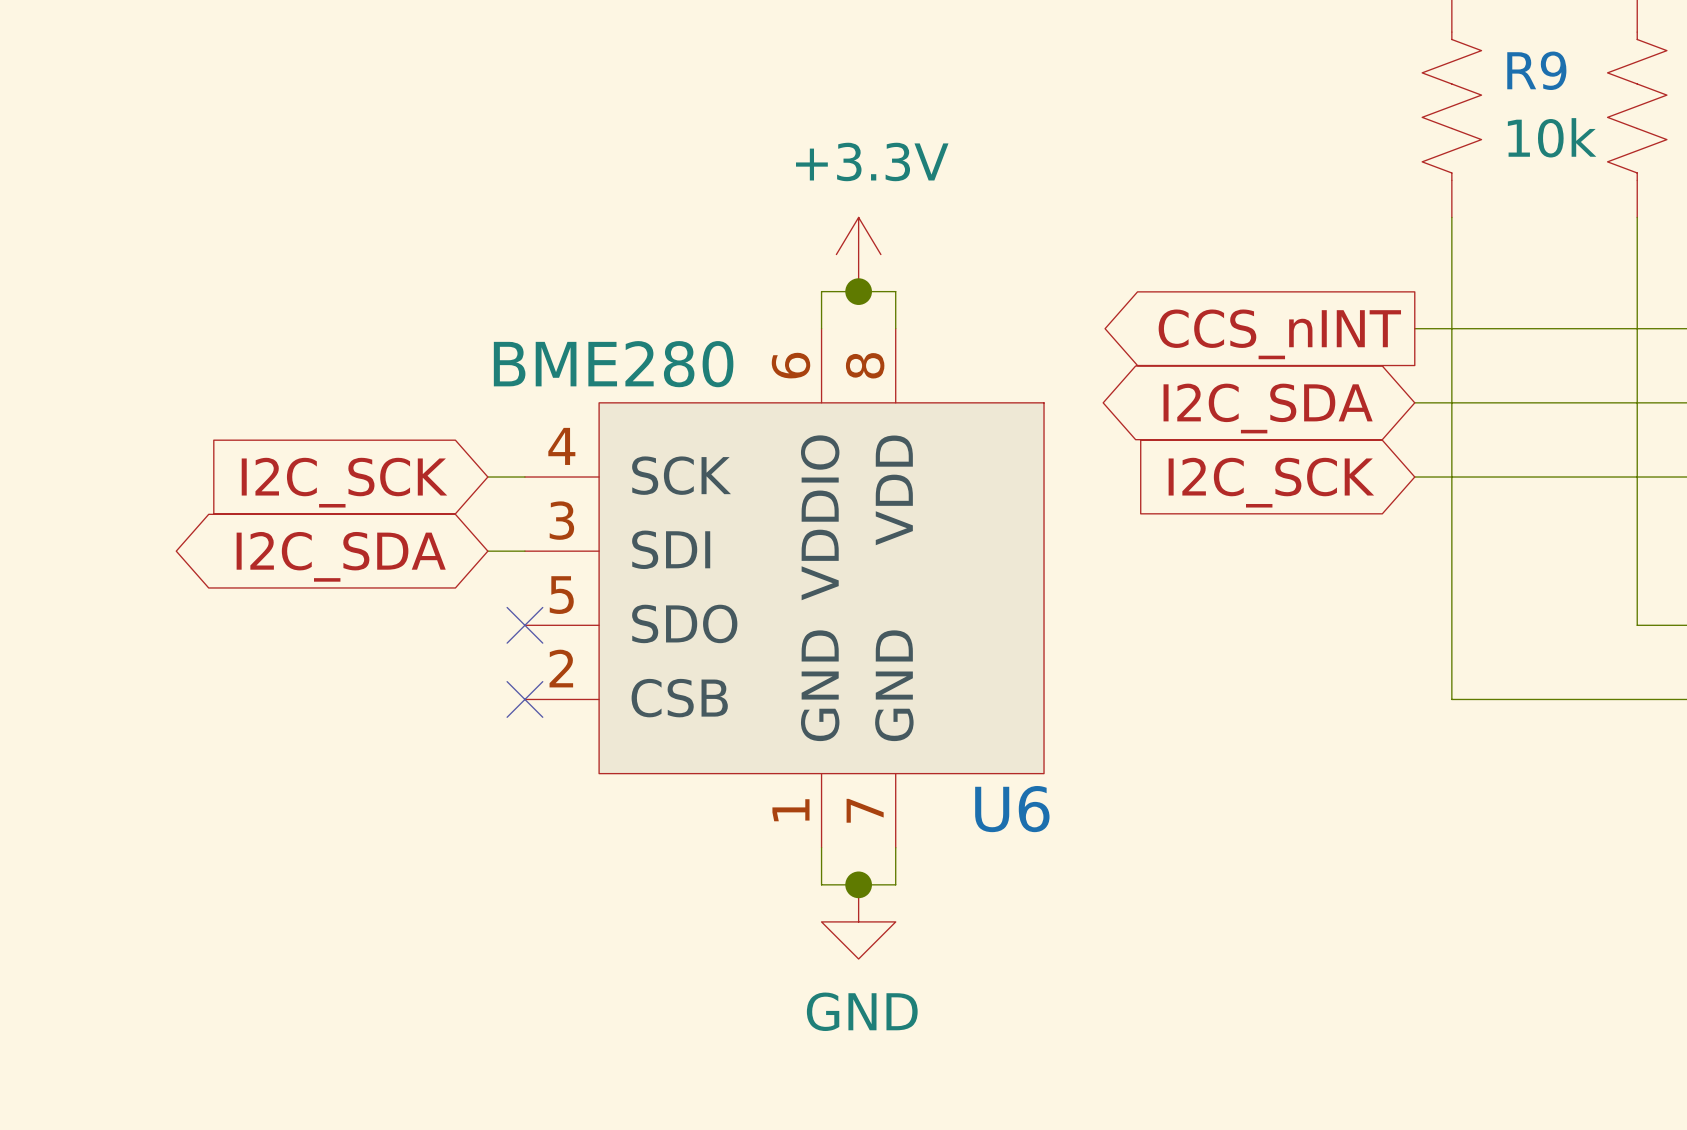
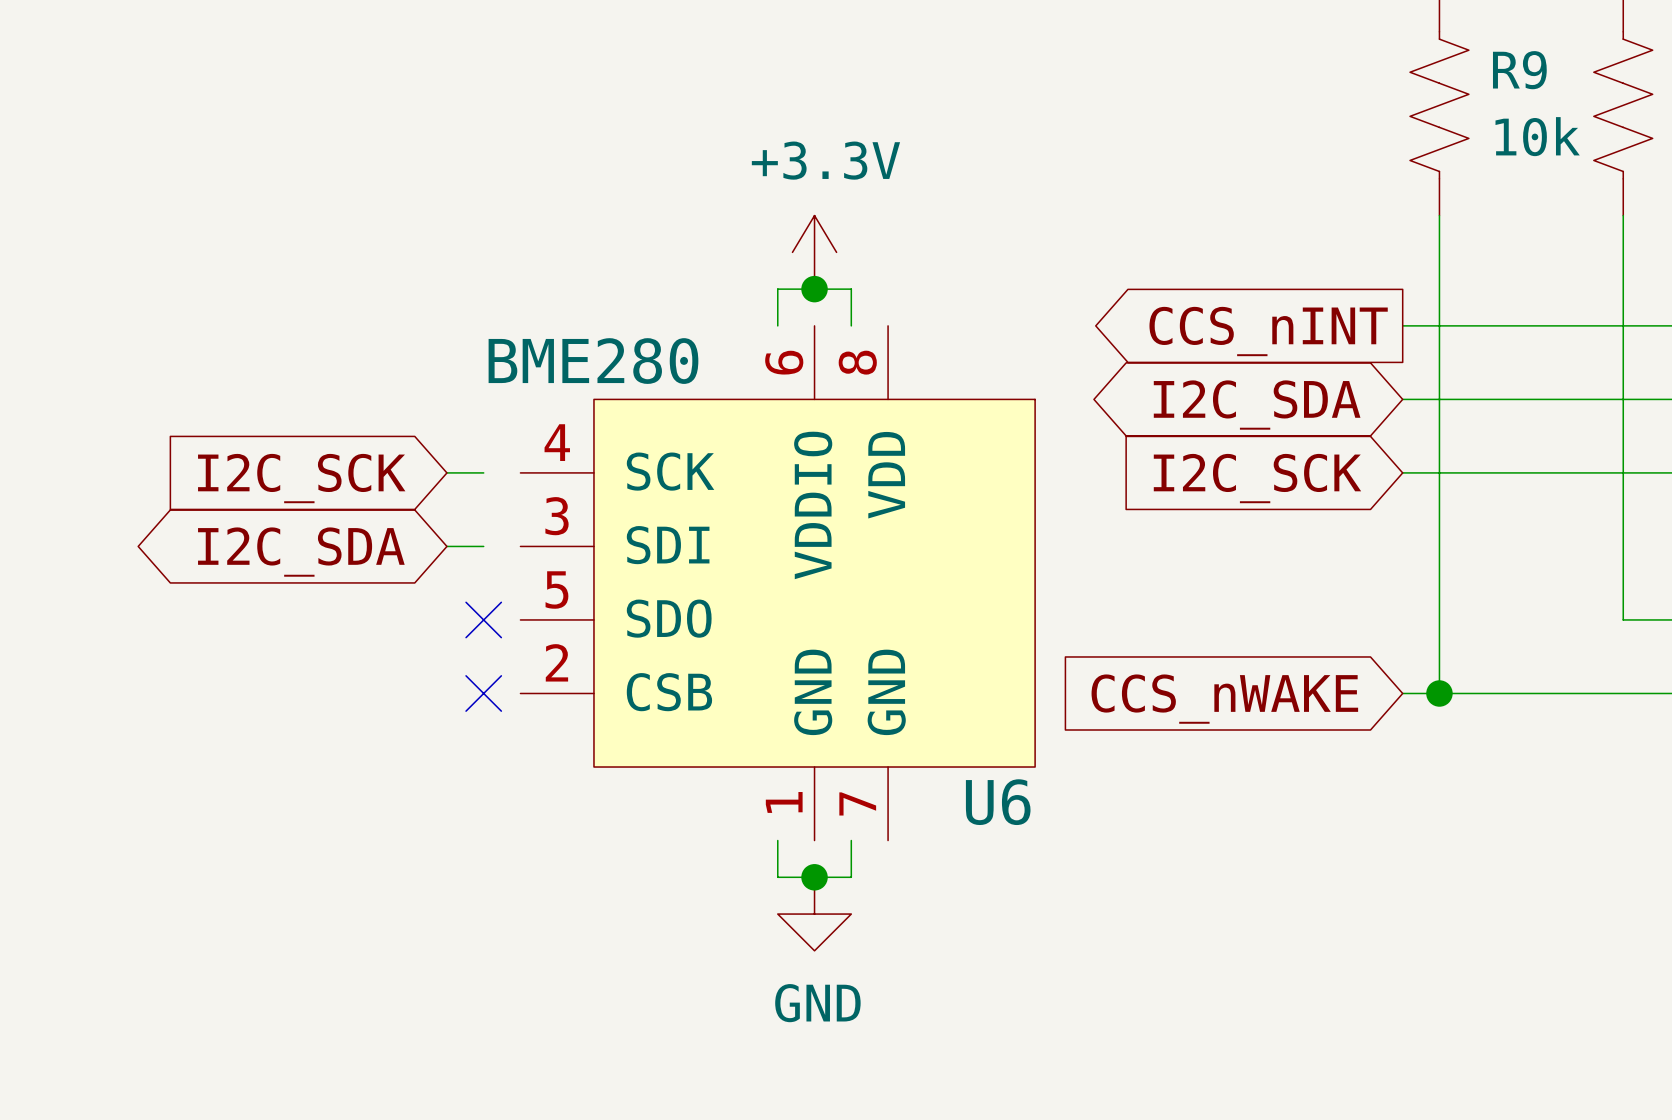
power symbol position: +3.3V (858, 254) -> +3.3V (814, 252)
wire: (821, 291) (821, 328) -> (814, 289) (777, 289) (777, 325)
wire: (858, 291) (895, 291) (895, 328) -> (851, 289) (851, 325)
junction position: (858, 291) -> (814, 289)
wire: (487, 477) (524, 477) -> (483, 472) (446, 472)
global label position: I2C_SCK (344, 482) -> I2C_SCK (301, 478)
wire: (487, 551) (524, 551) -> (483, 546) (446, 546)
global label position: I2C_SDA (341, 556) -> I2C_SDA (301, 552)
no-connect mark position: (524, 625) -> (483, 619)
no-connect mark position: (524, 699) -> (483, 693)
wire: none -> (1402, 693) (1439, 693)
junction: none -> (1439, 693)
global label: none -> CCS_nWAKE (1224, 699)
wire: (821, 847) (821, 884) -> (777, 840) (777, 877) (814, 877)
wire: (895, 847) (895, 884) (858, 884) -> (851, 840) (851, 877)
junction position: (858, 884) -> (814, 877)
power symbol position: GND (858, 921) -> GND (814, 914)

